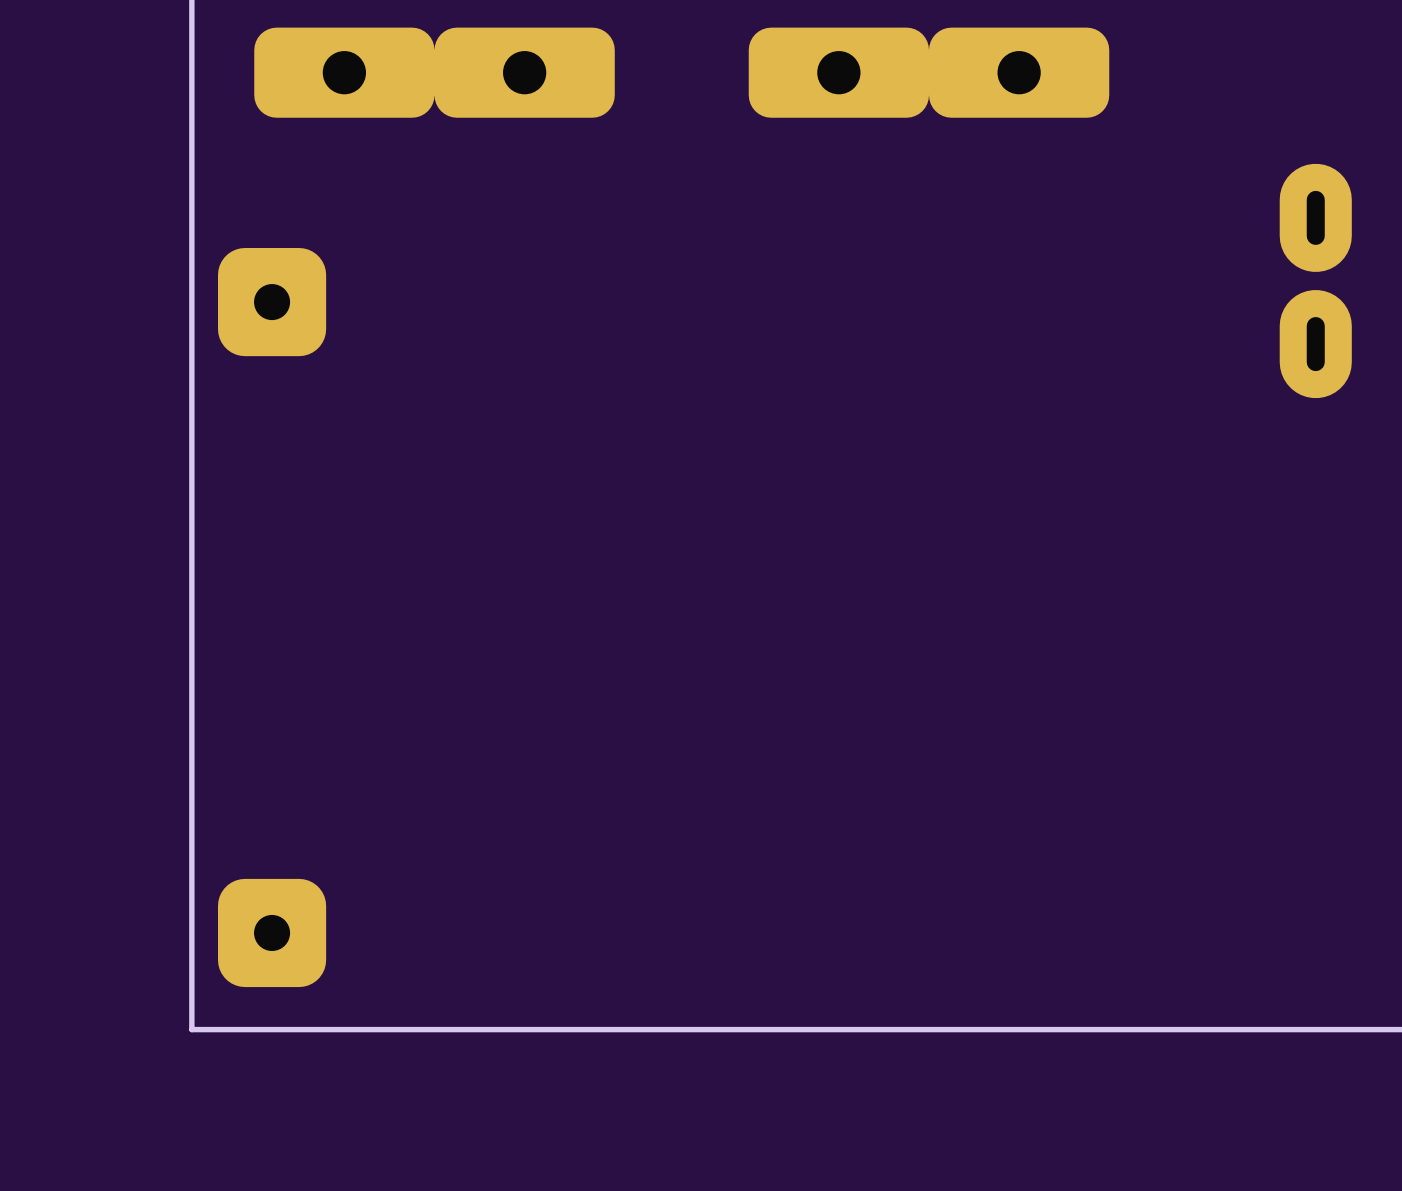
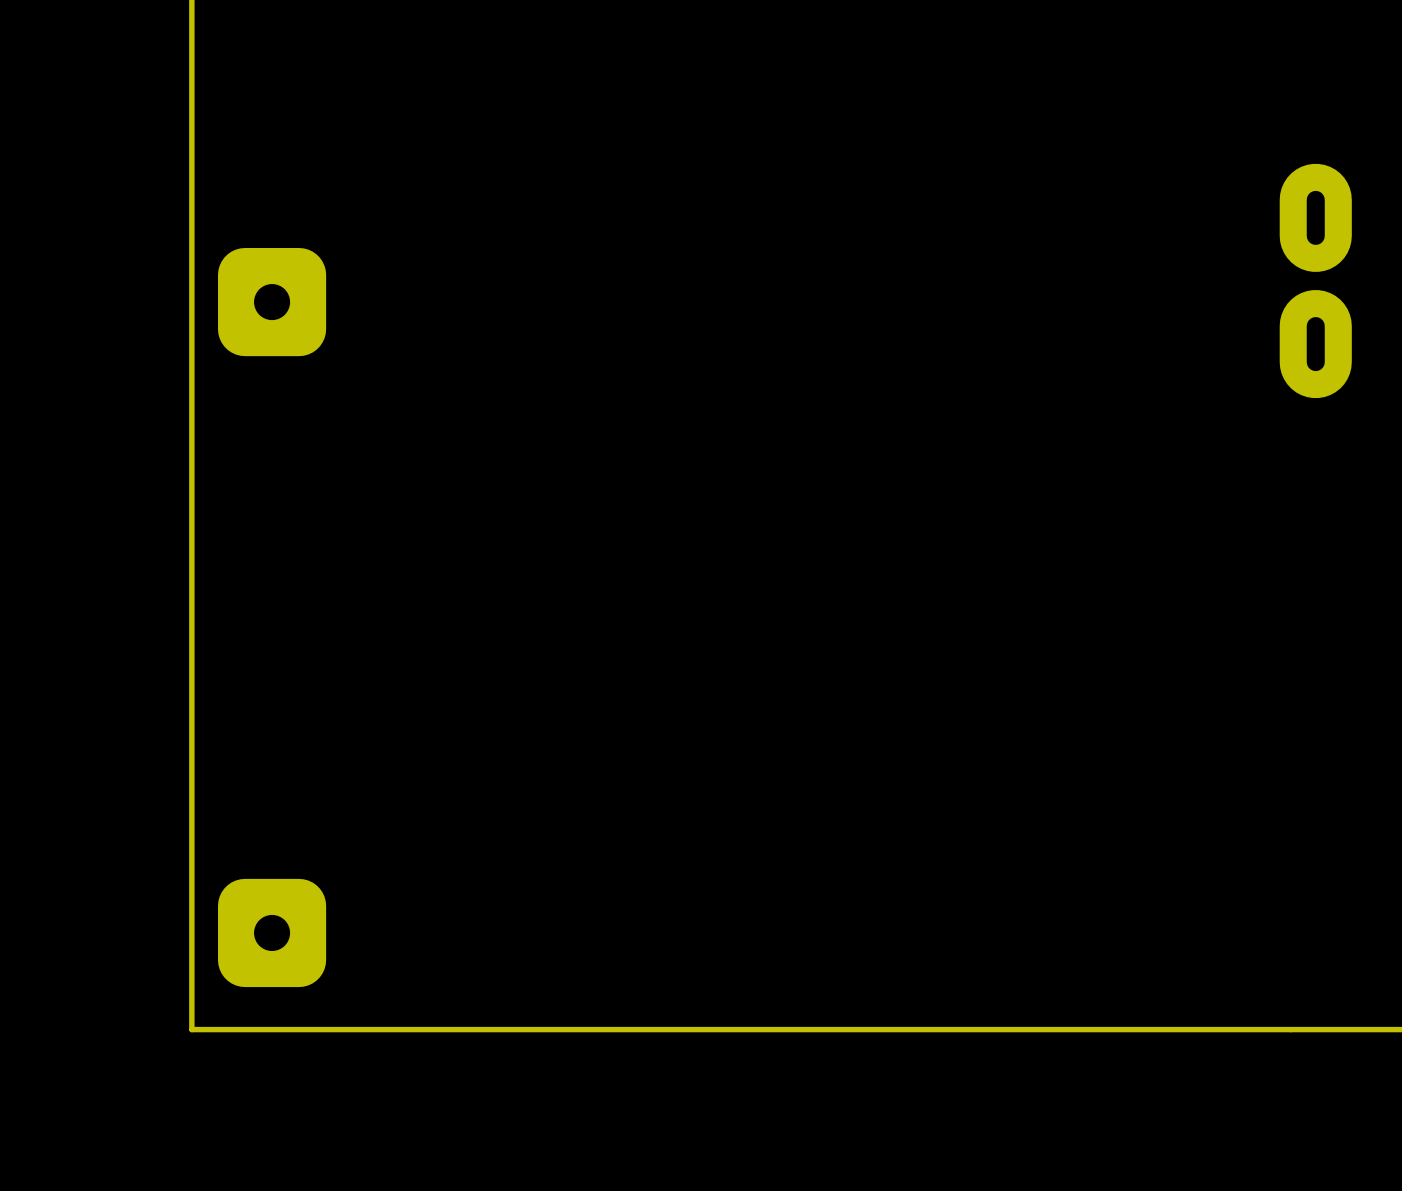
part: (434, 72) -> none
part: (929, 72) -> none

